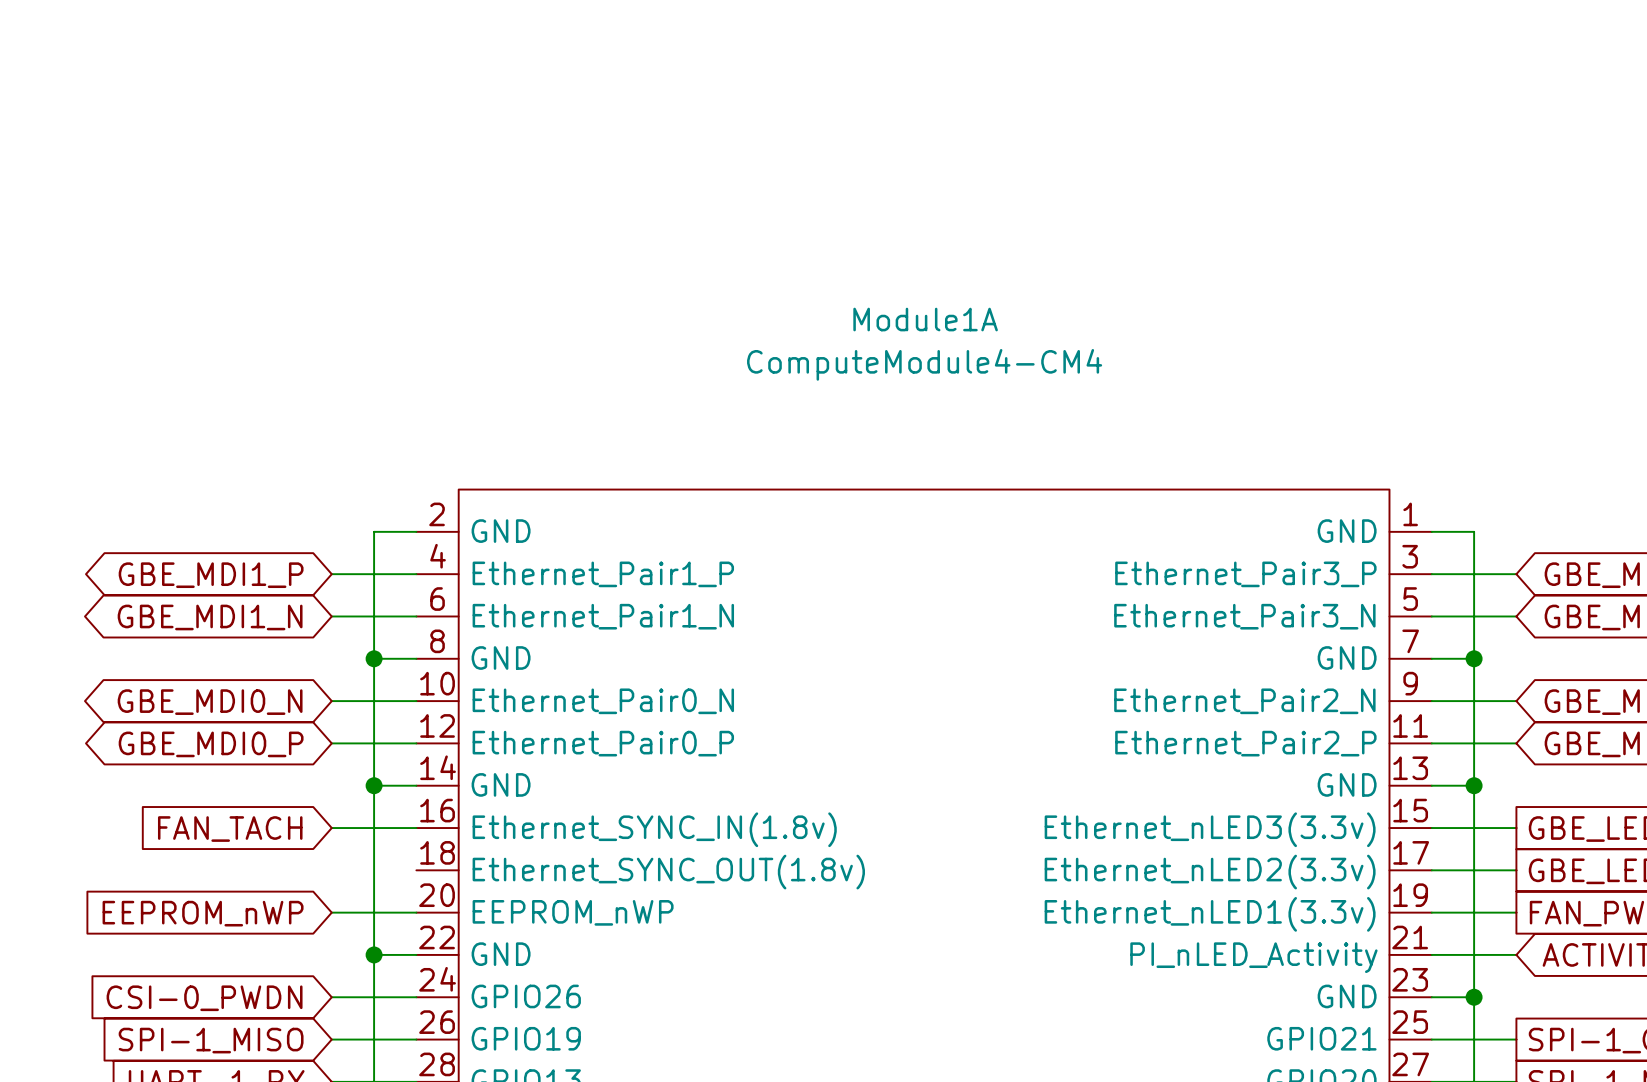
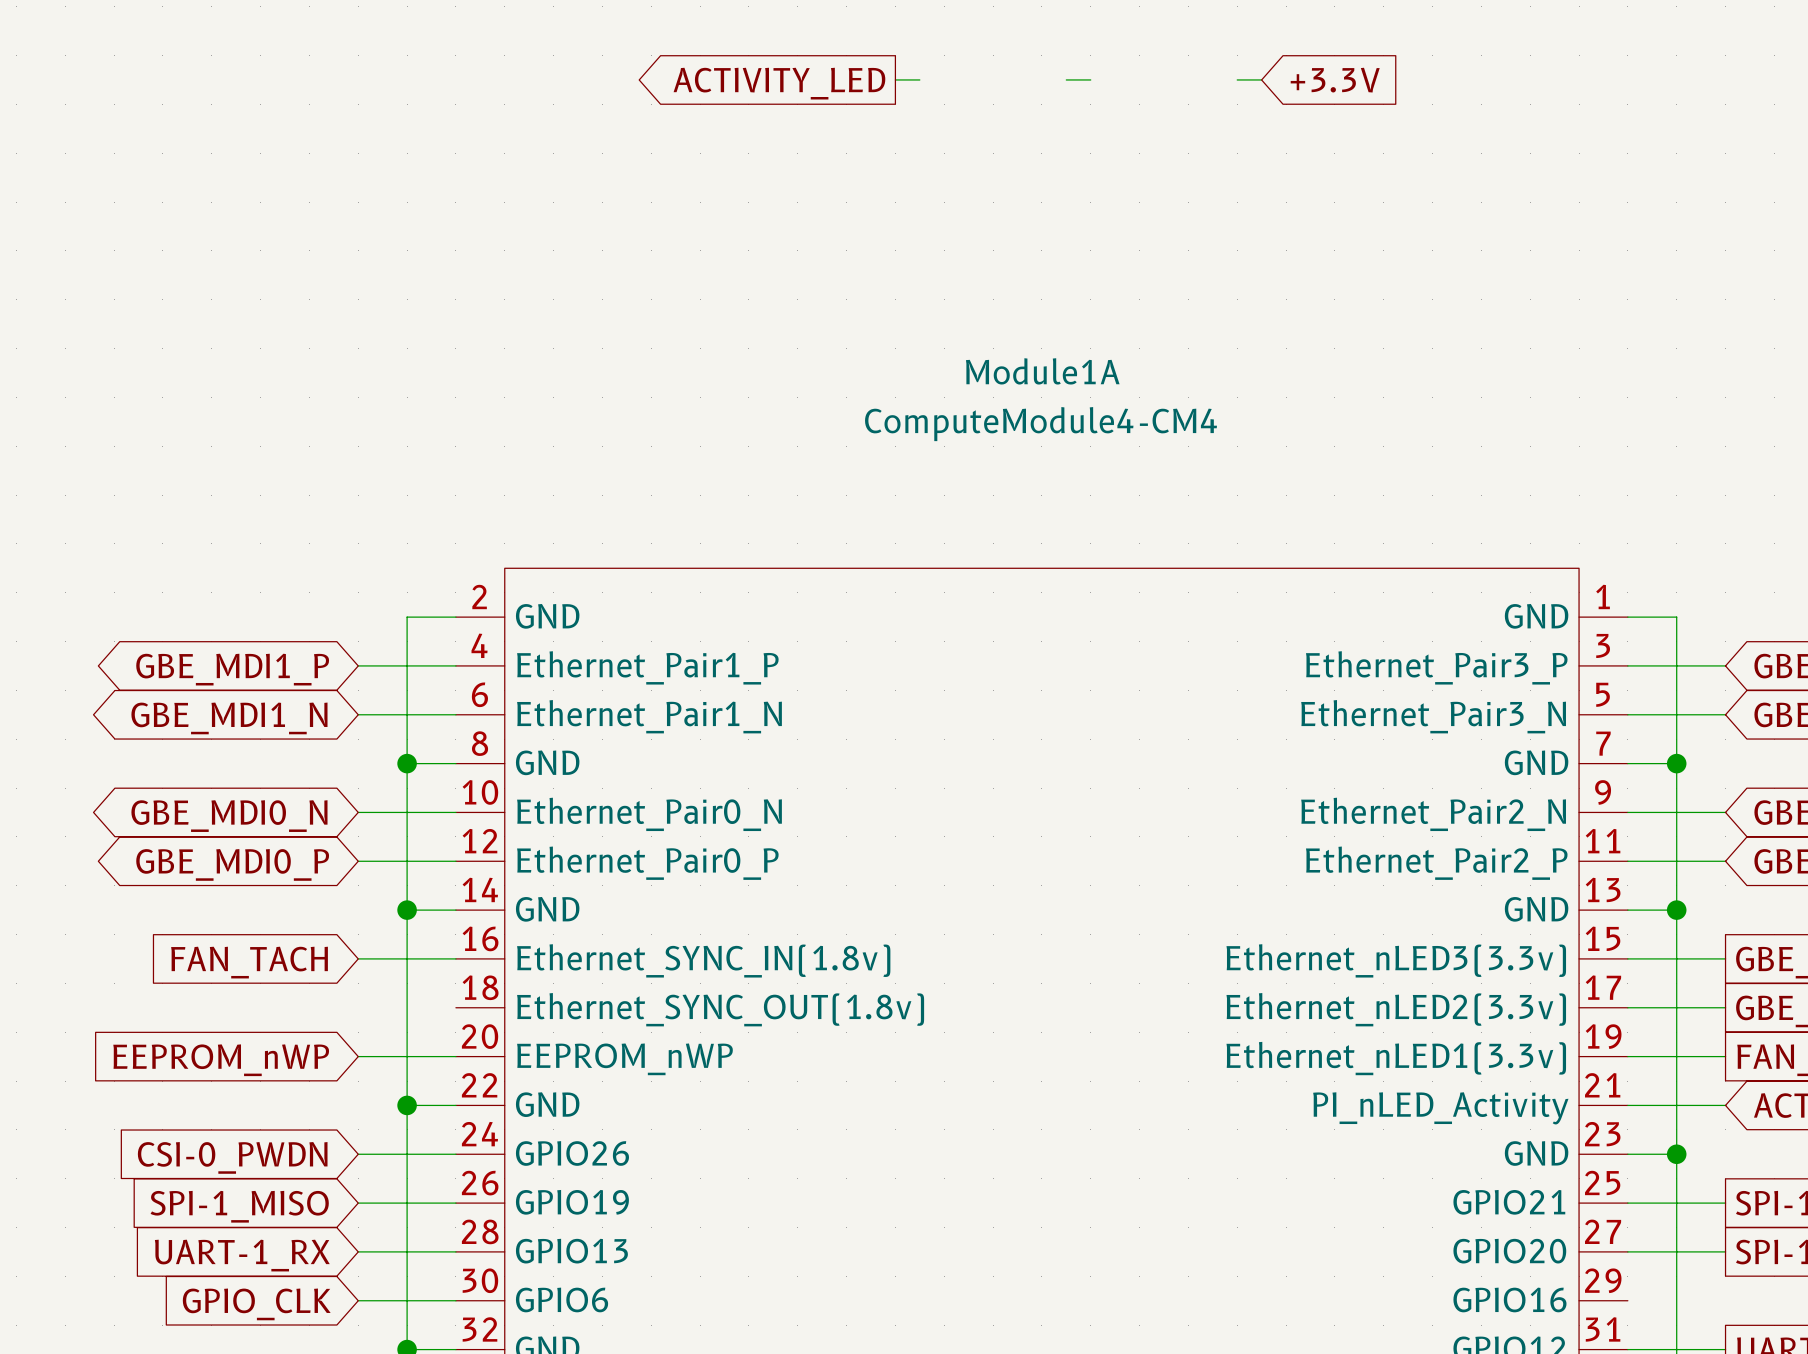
wire: none -> (895, 79) (919, 79)
wire: none -> (1066, 79) (1090, 79)
wire: none -> (1237, 79) (1261, 79)
global label: none -> +3.3V (1335, 80)
global label: none -> ACTIVITY_LED (779, 83)

